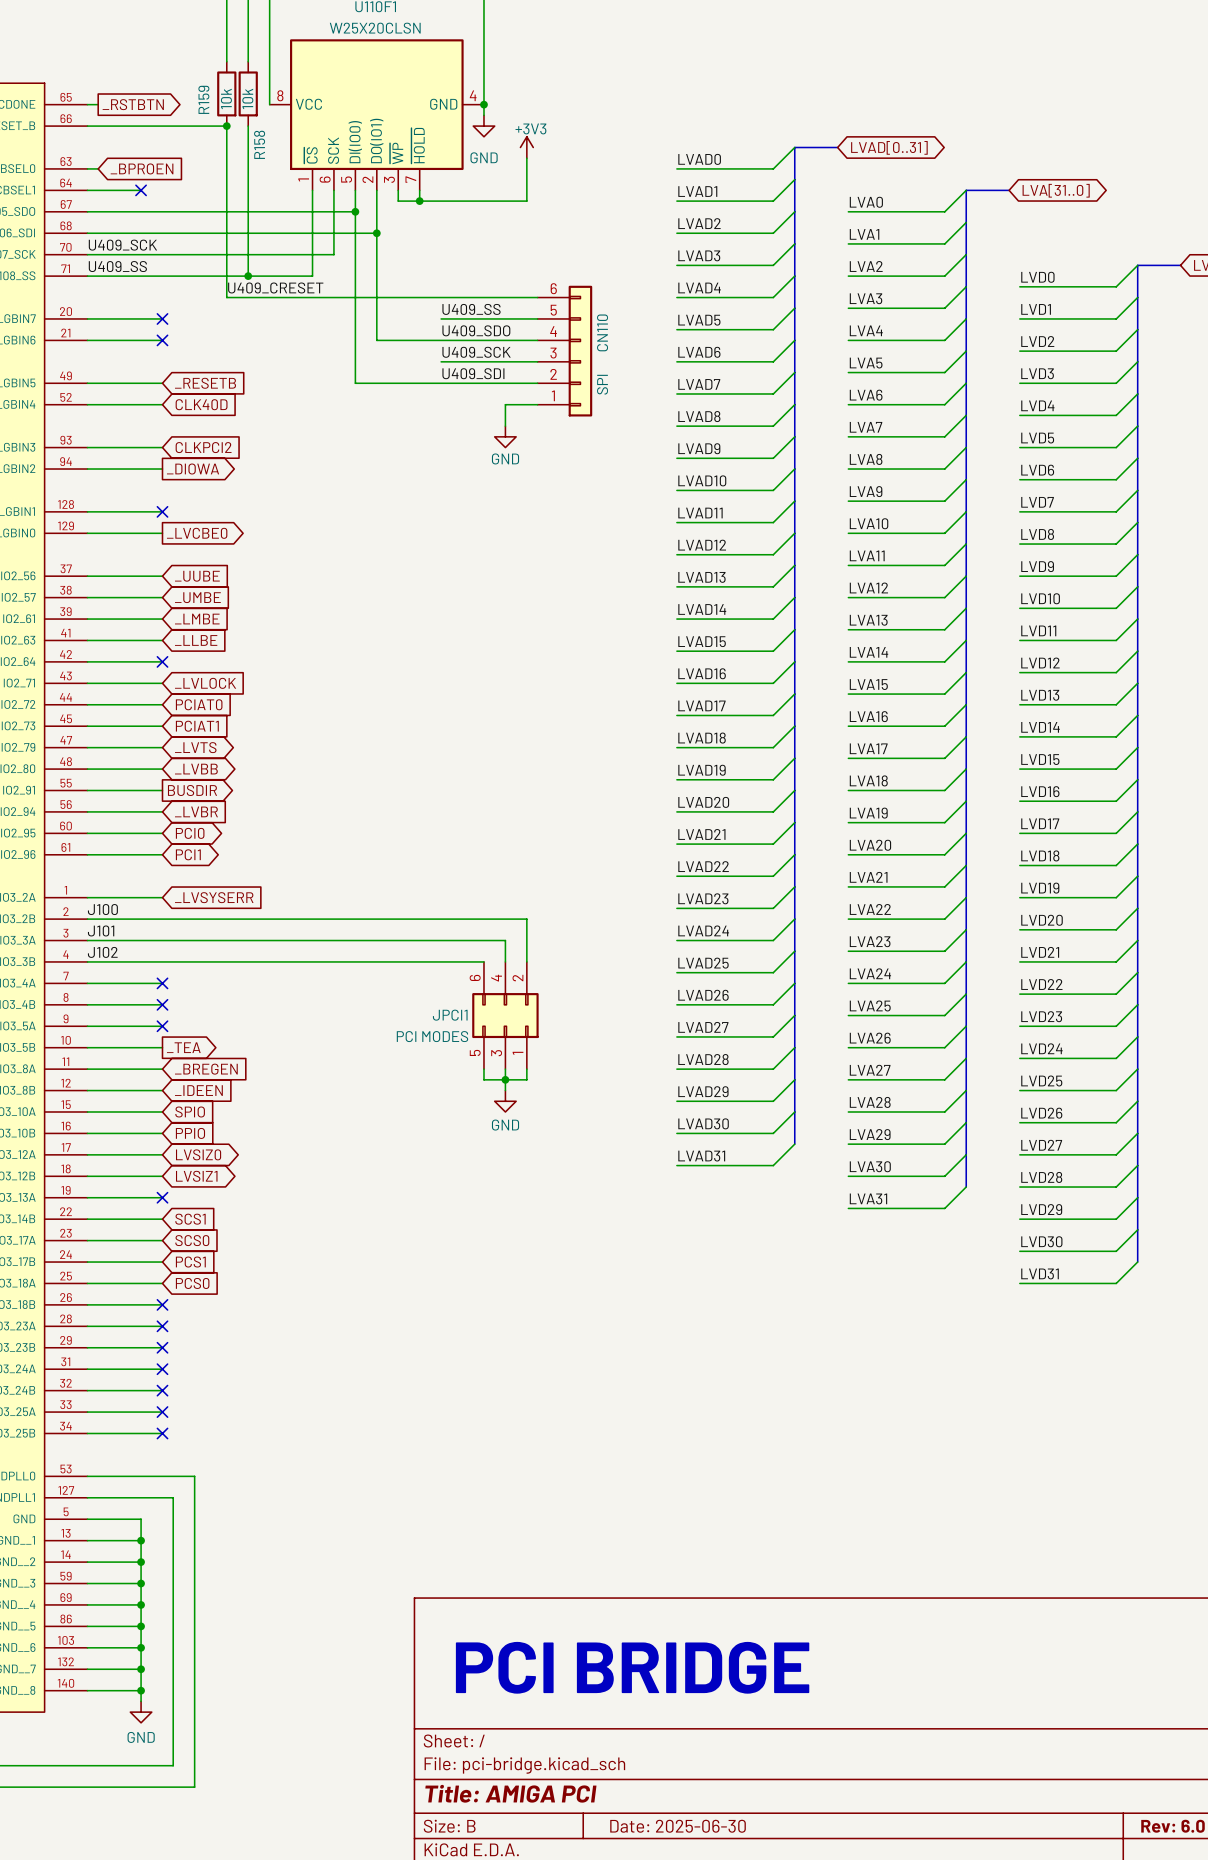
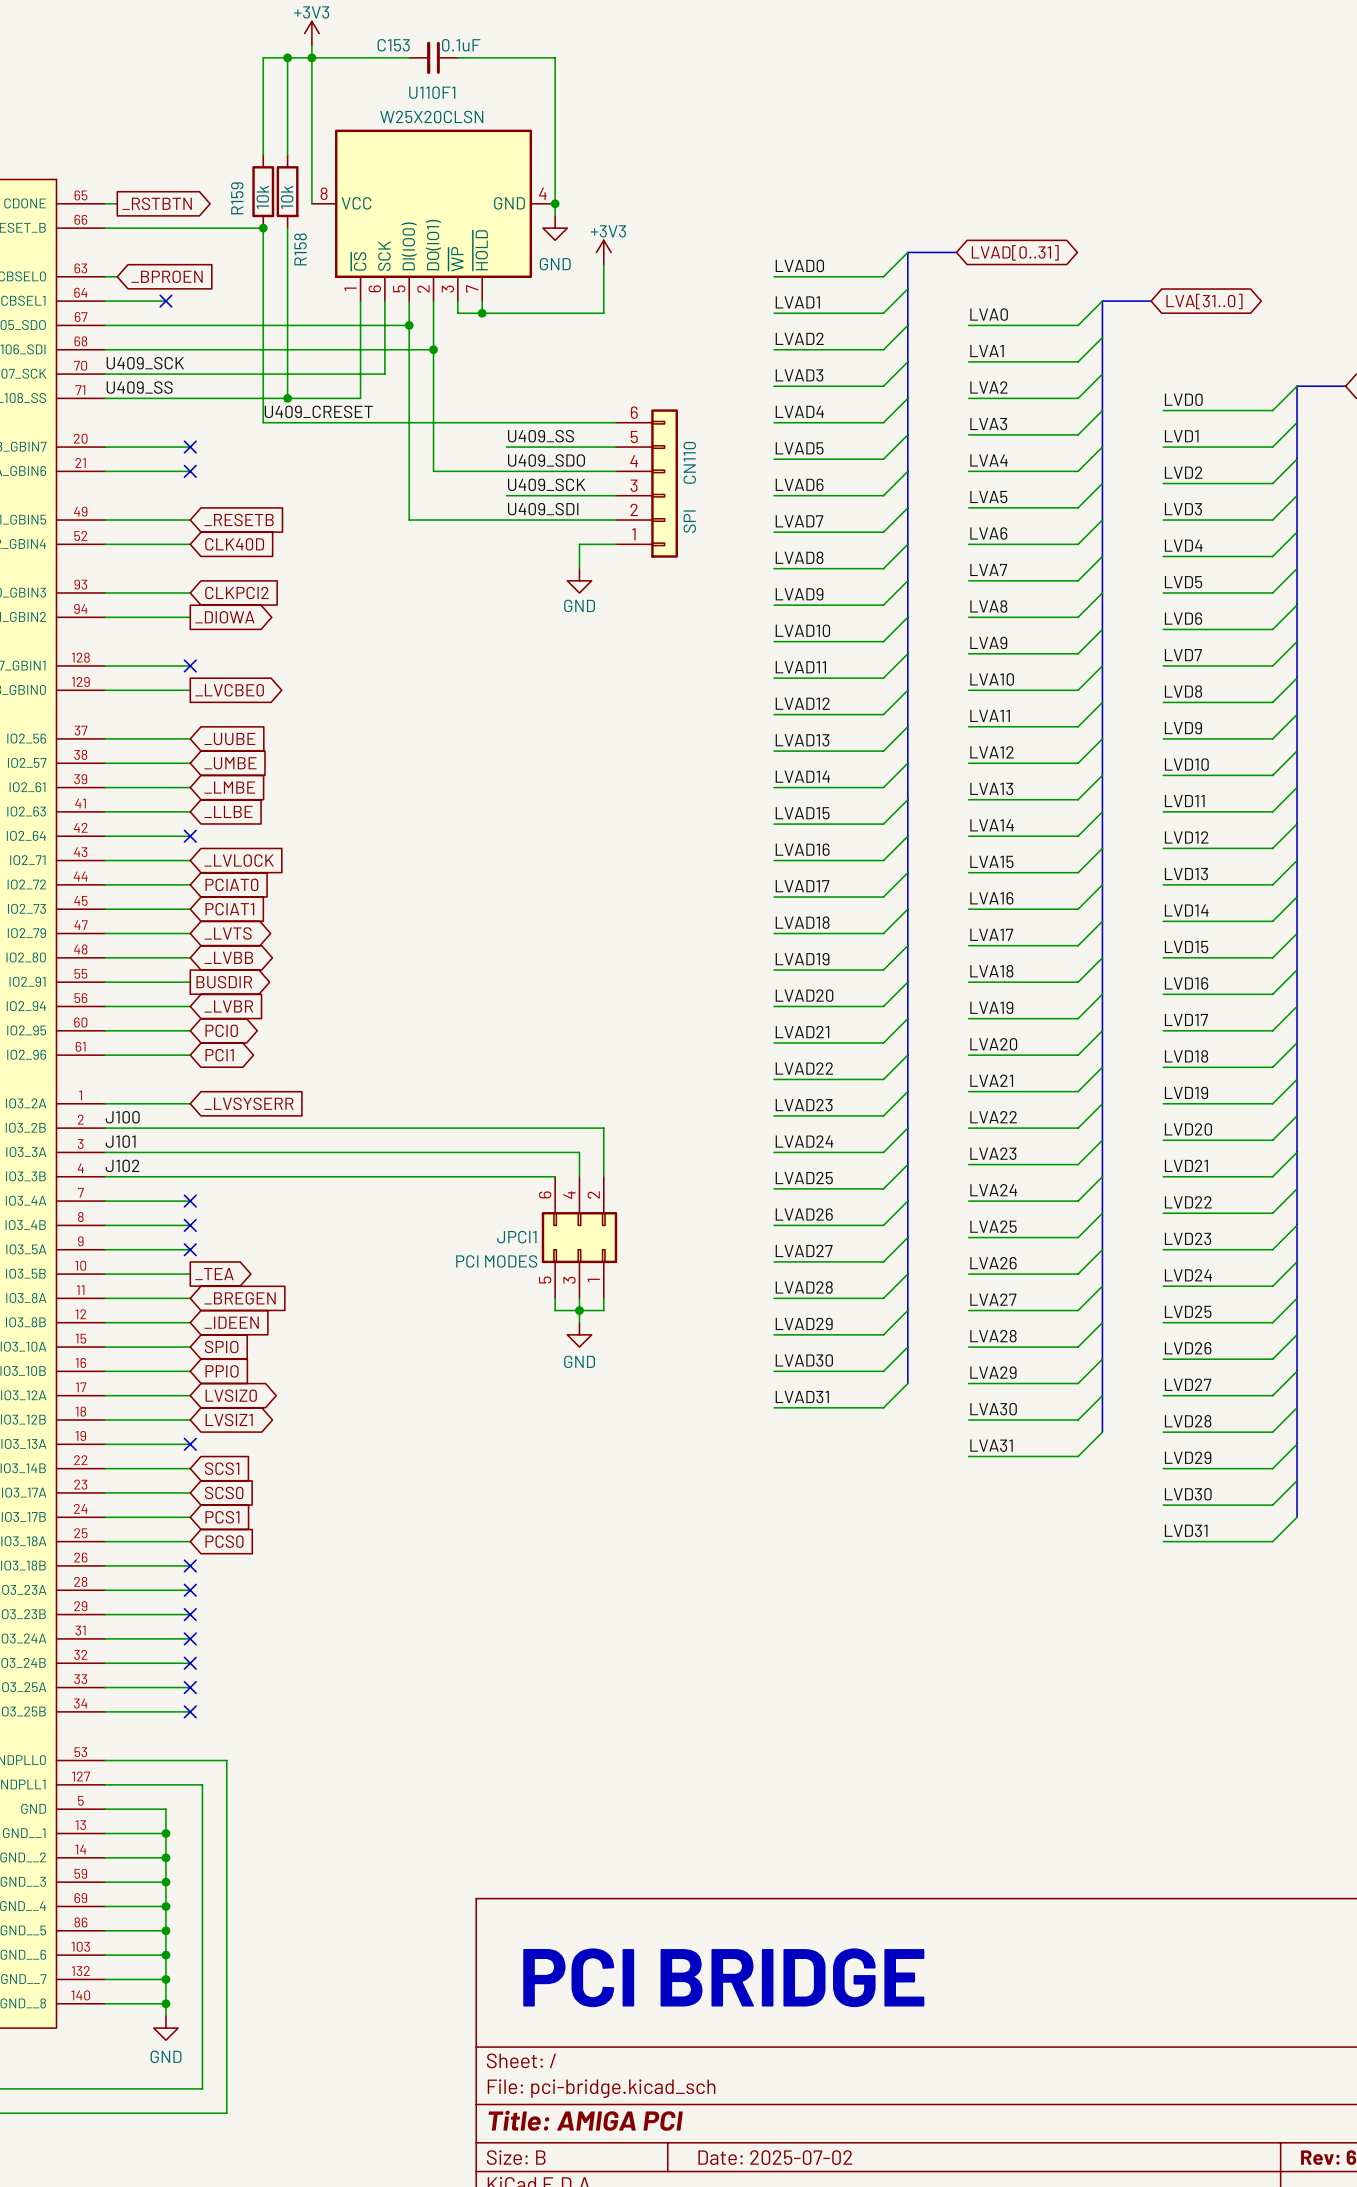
title block: Date: 2025-06-30 (678, 1826) -> Date: 2025-07-02 (775, 2157)

